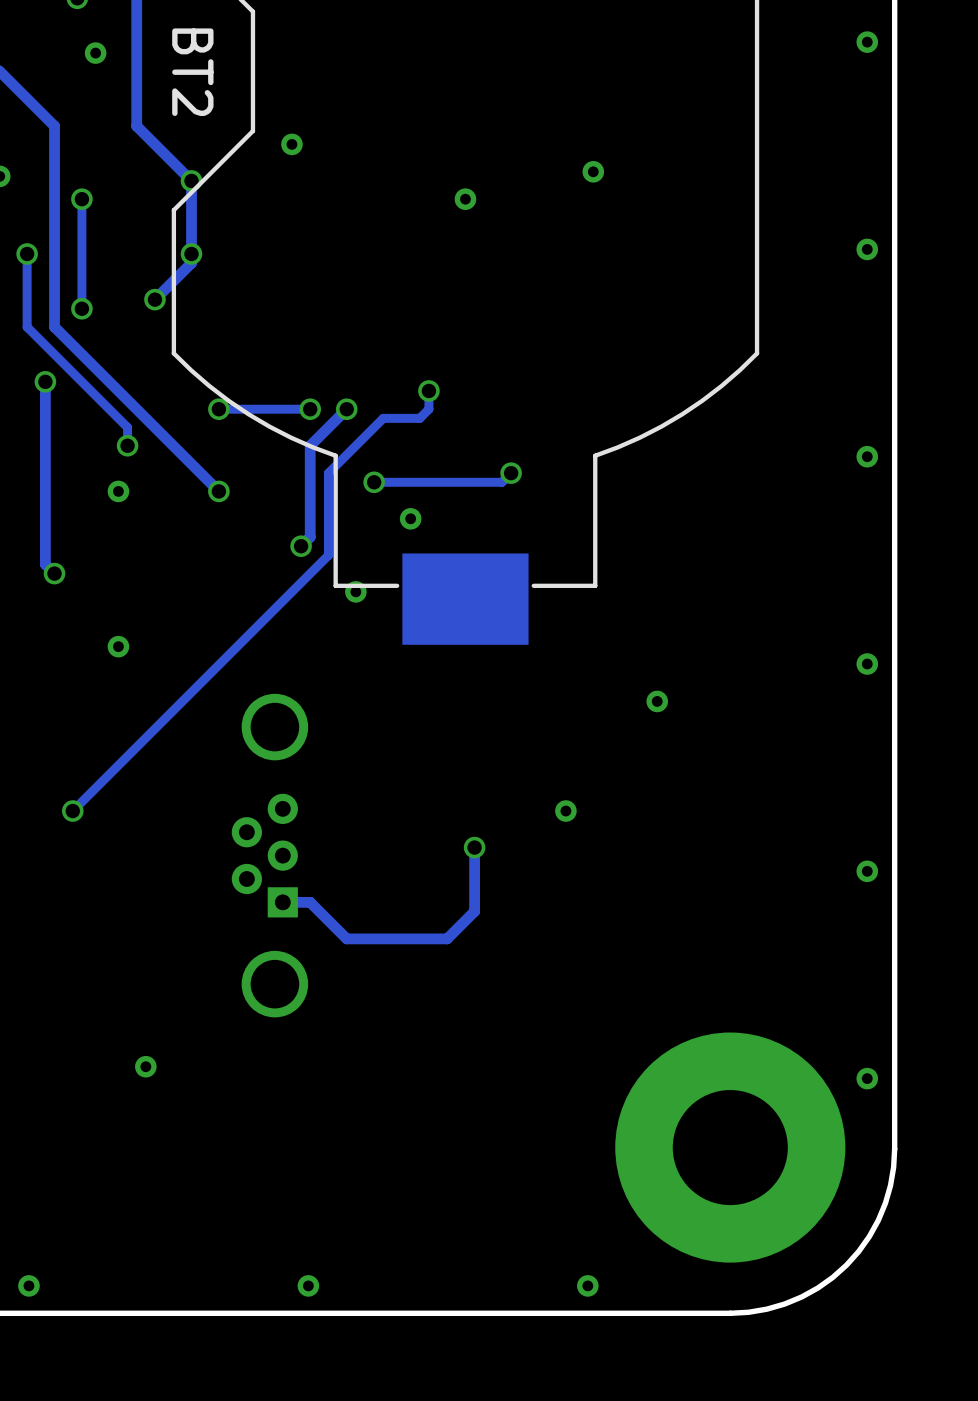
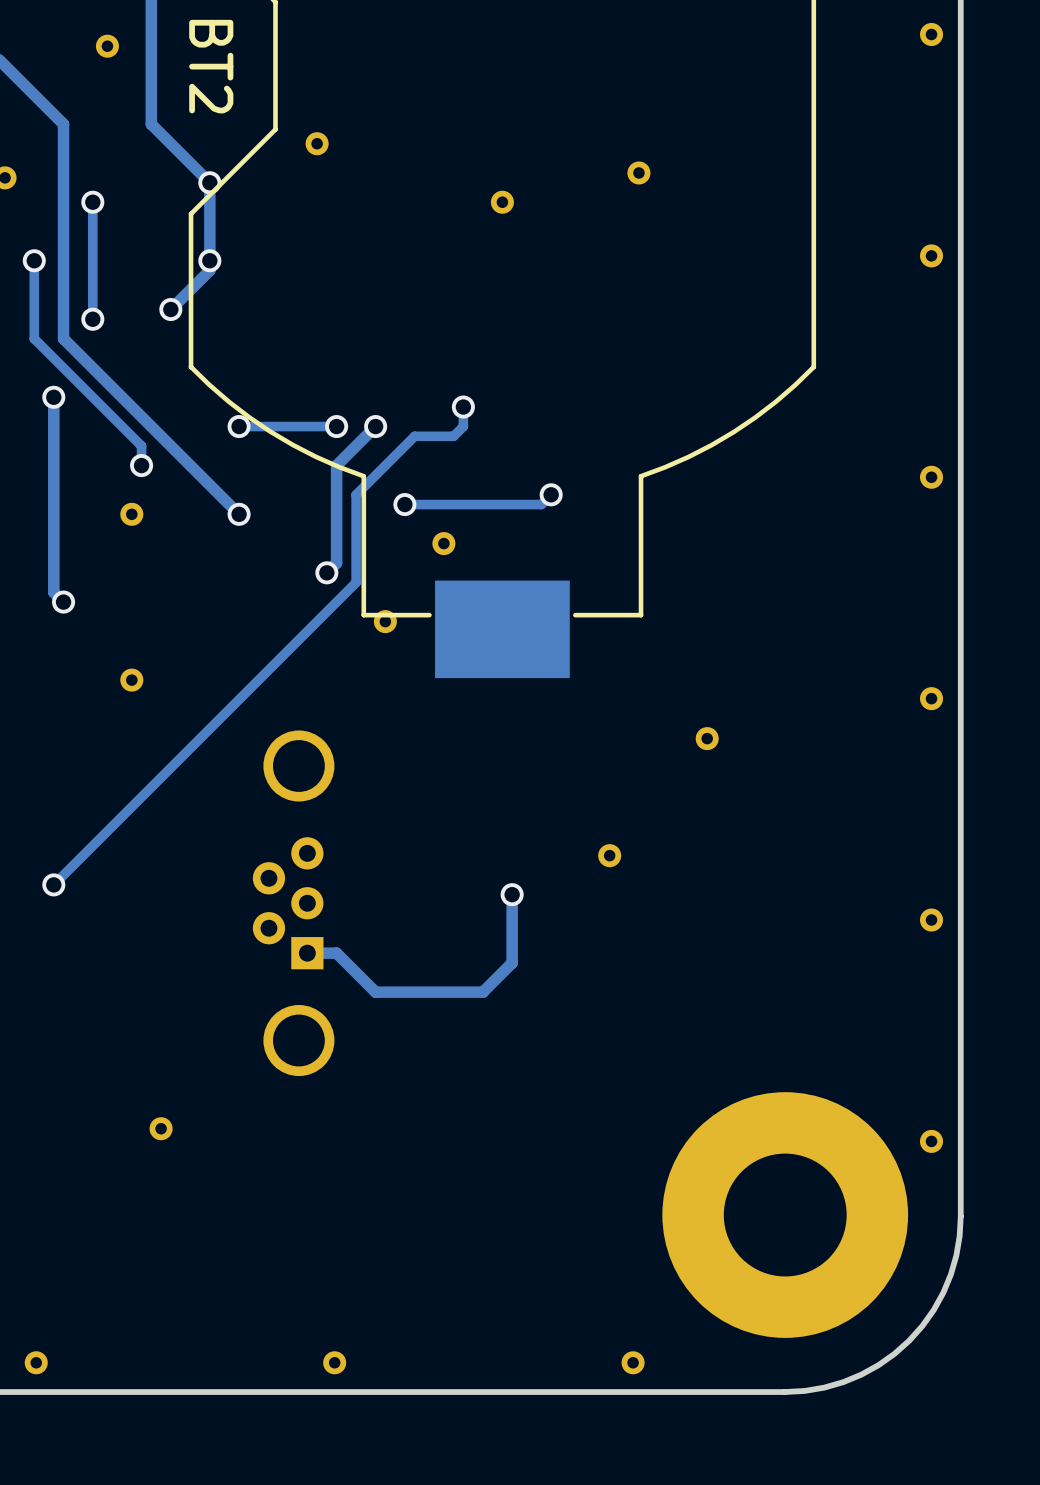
track: none -> (83, 855) (53, 884)
via position: (72, 811) -> (53, 884)

